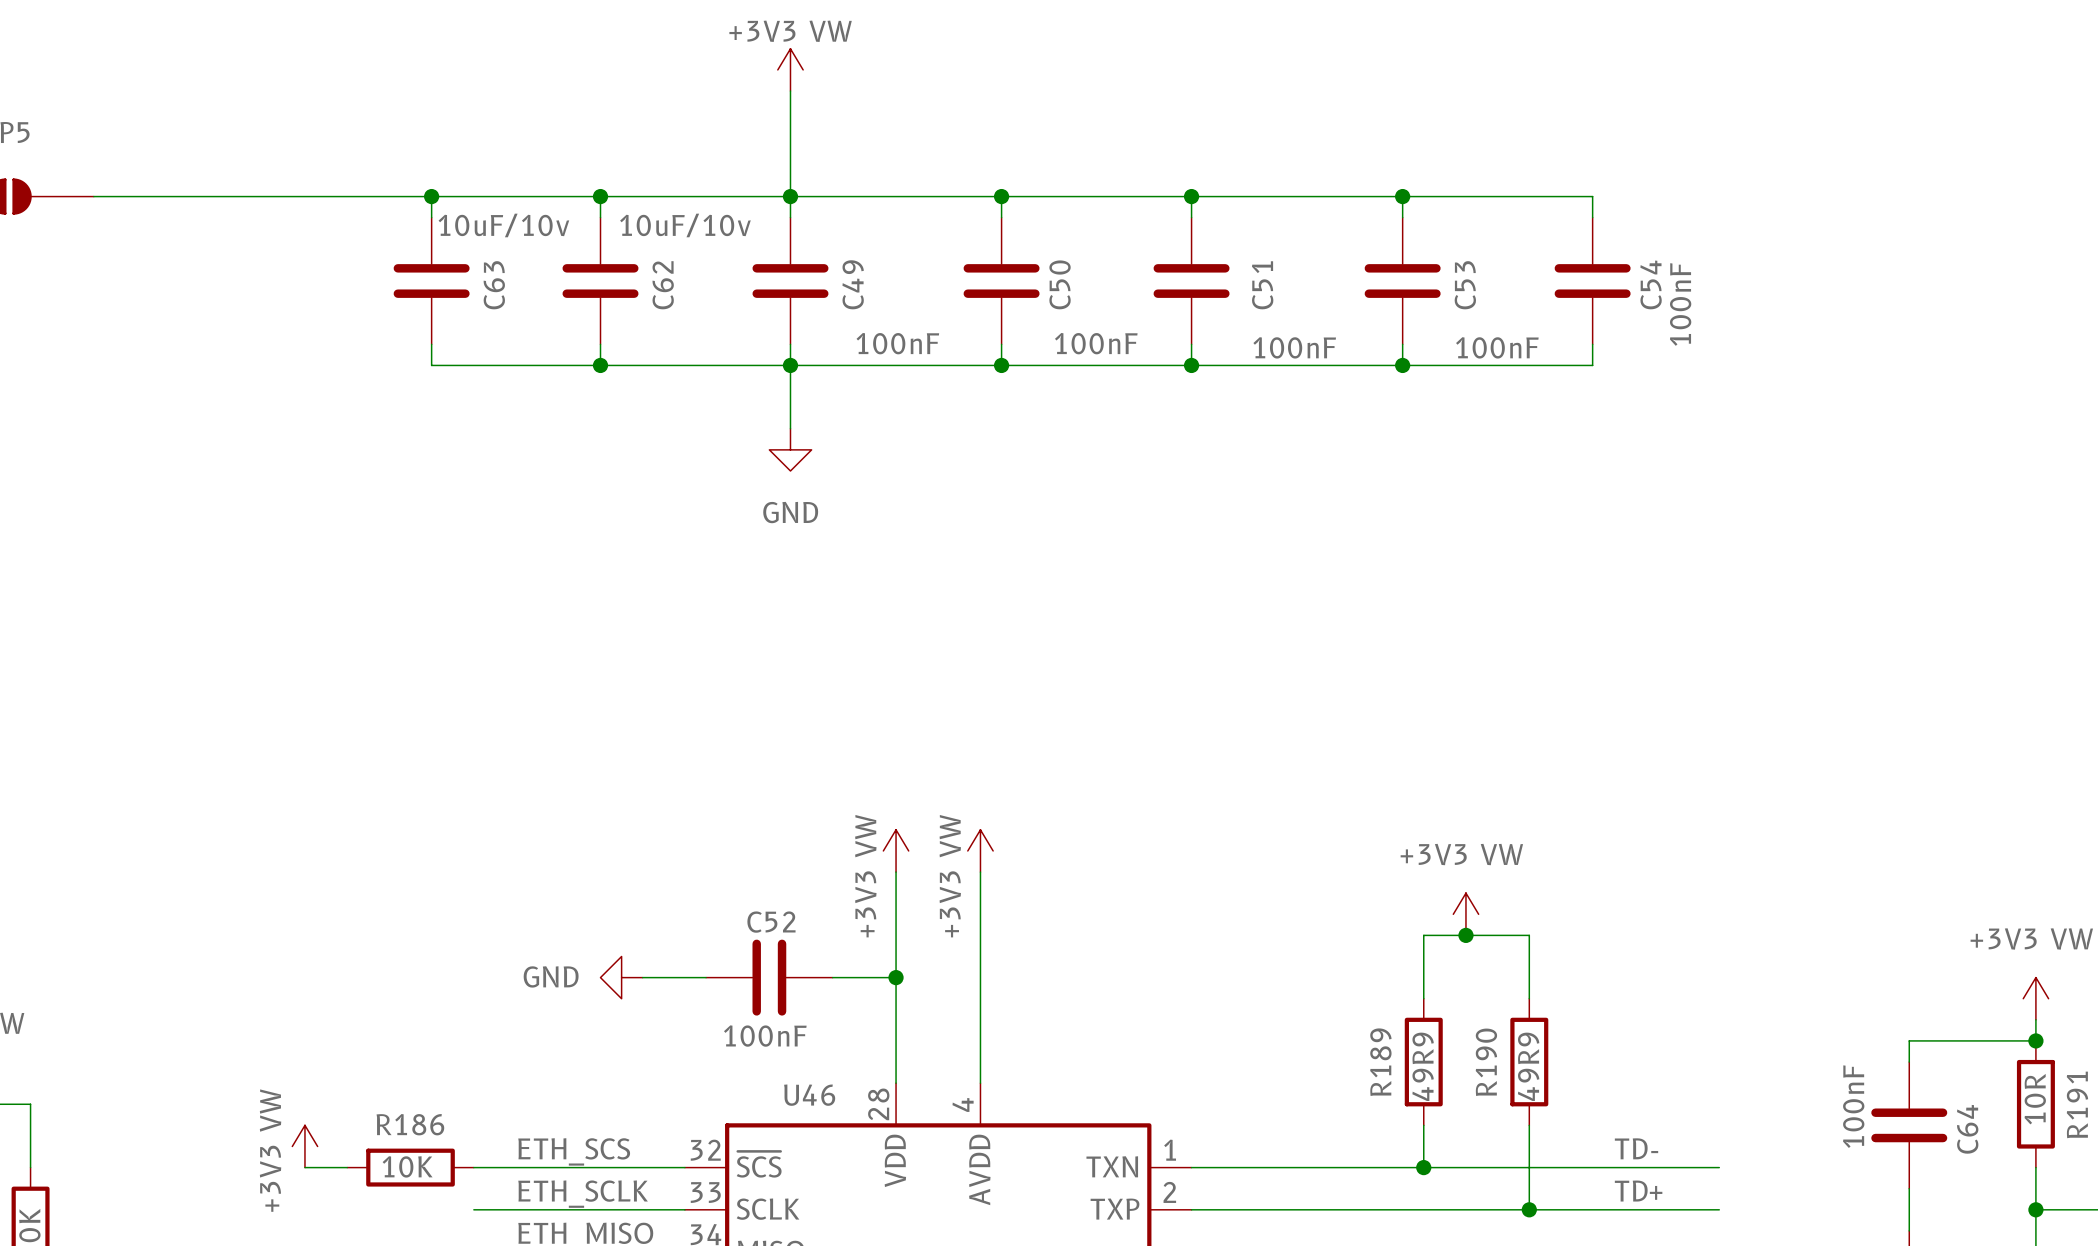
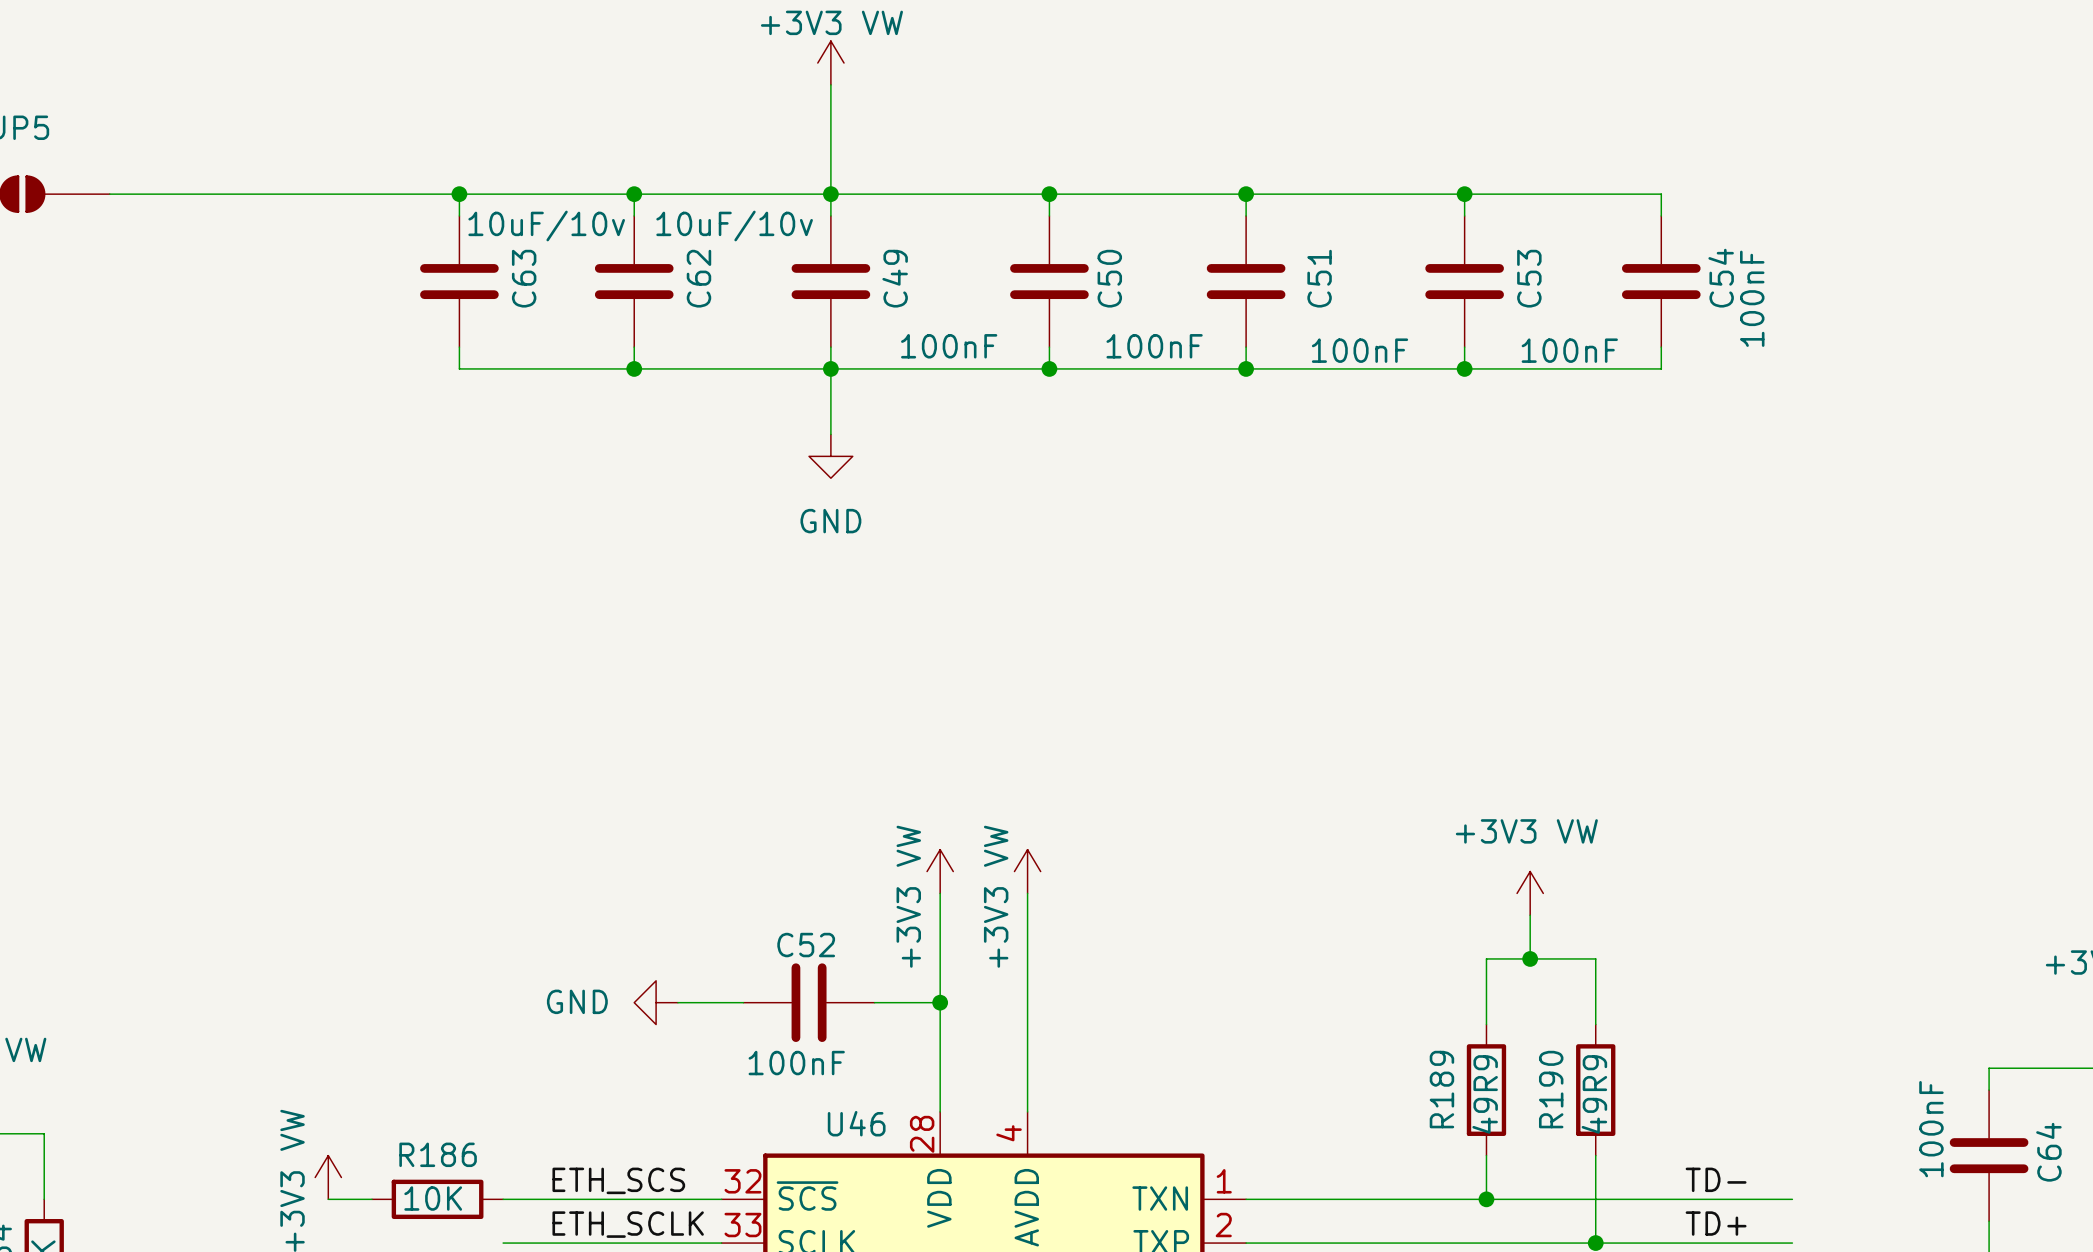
power symbol position: +3V3 VW (1465, 914) -> +3V3 VW (1530, 893)

